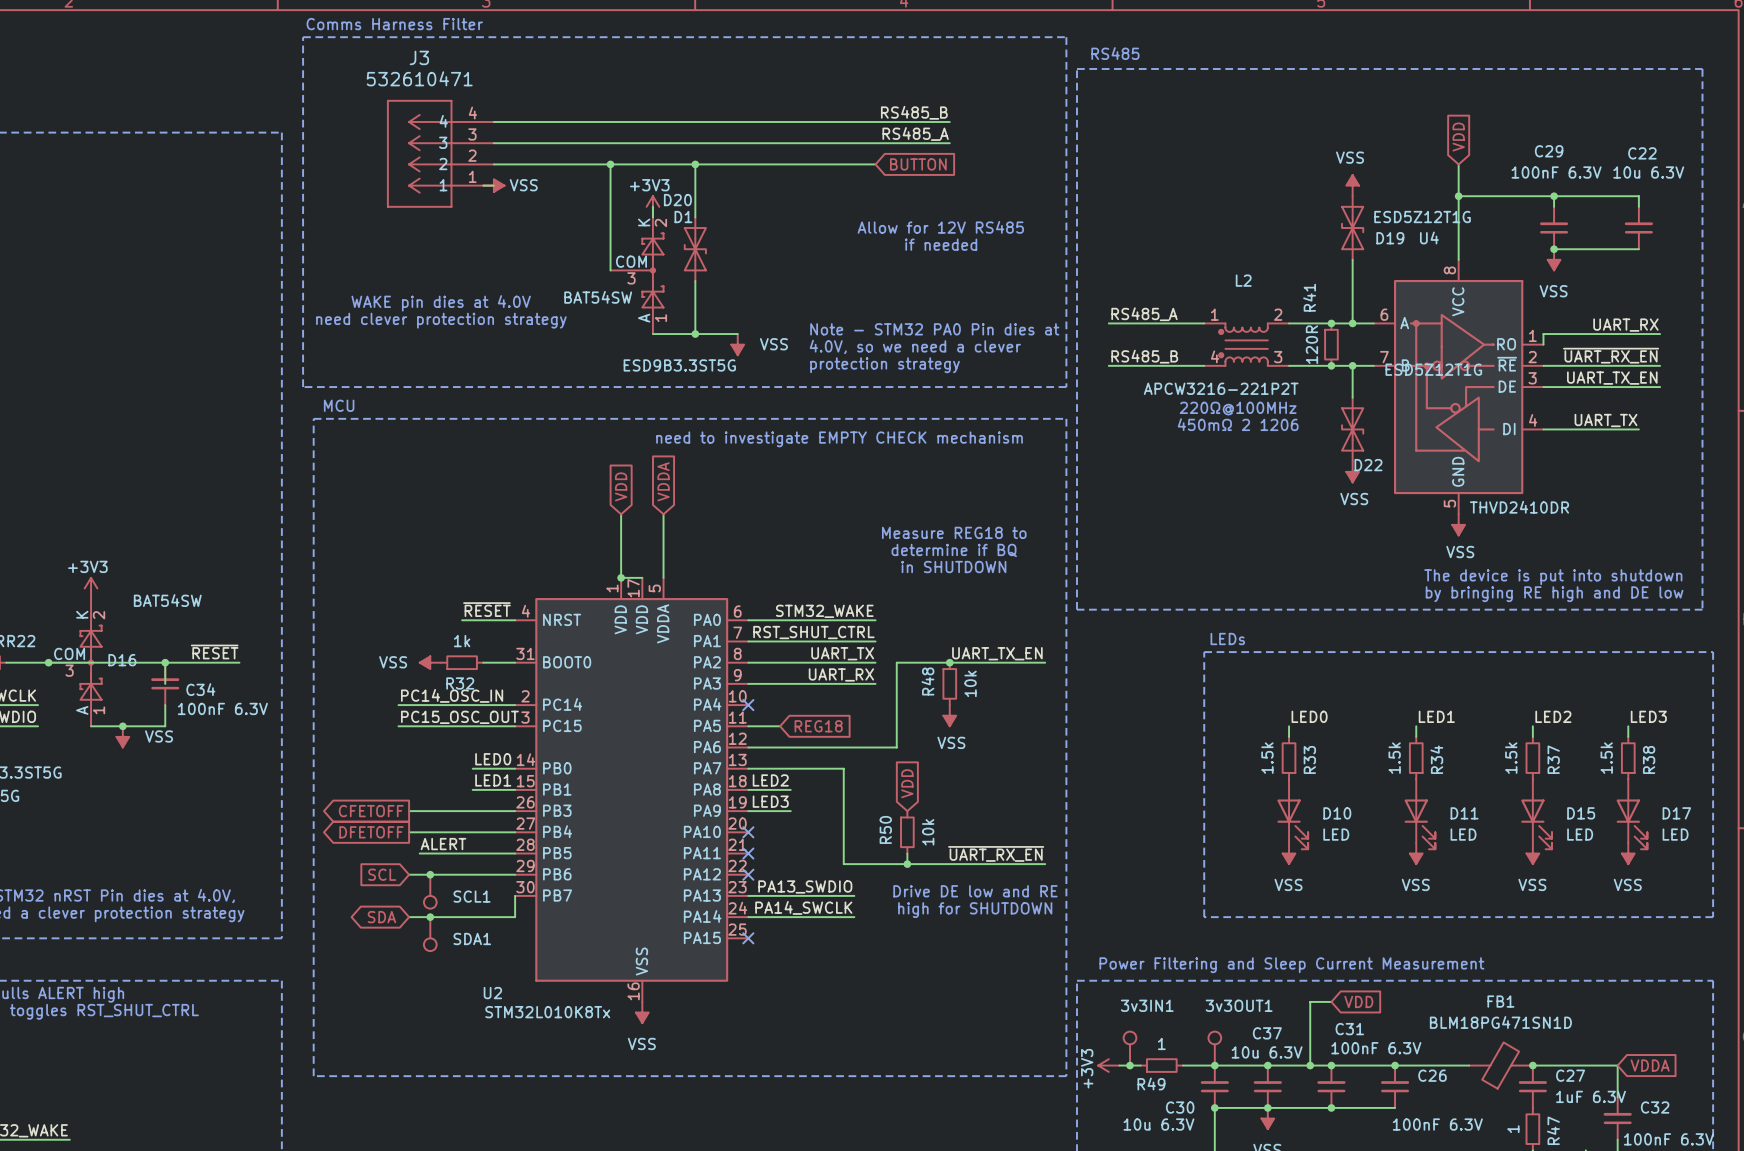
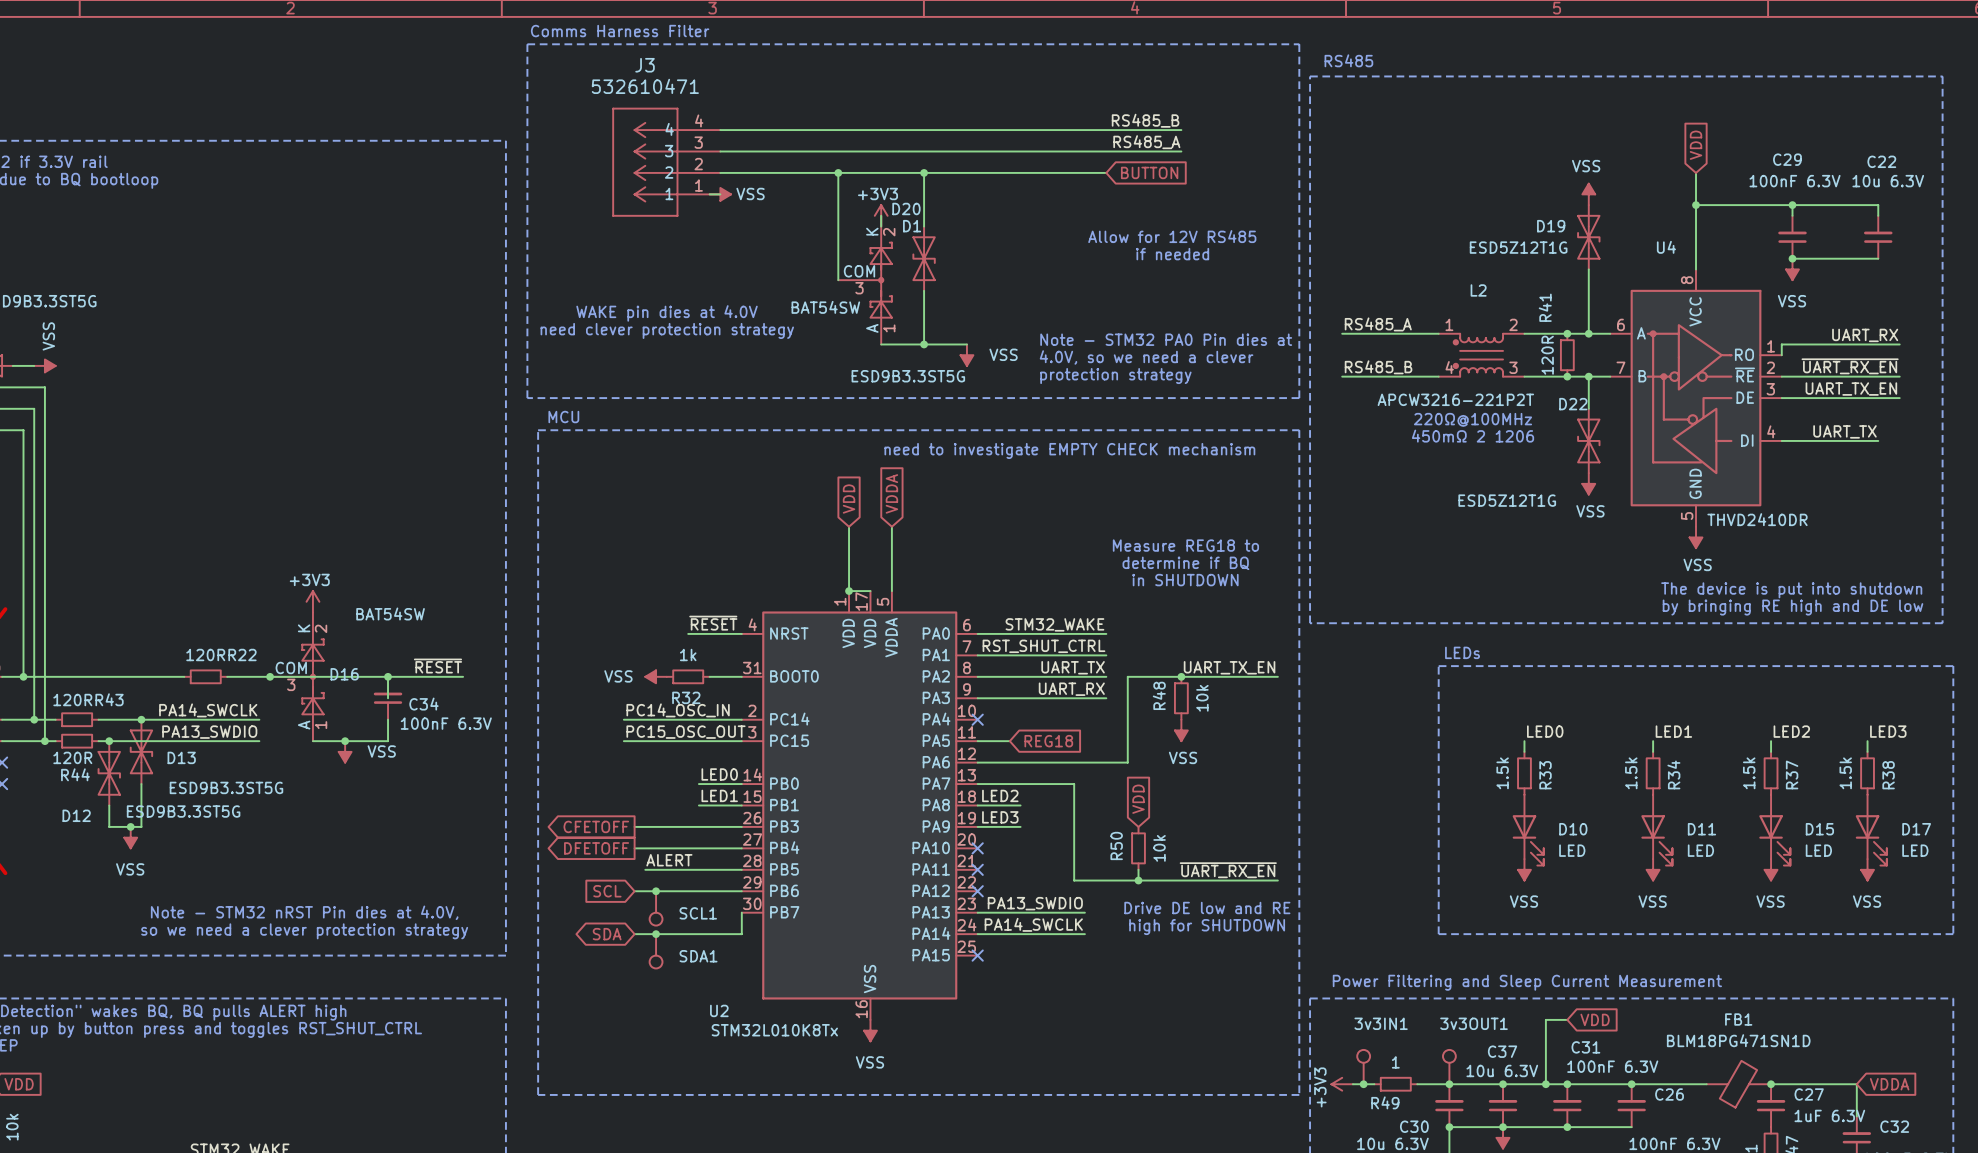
D19 value position: ESD5Z12T1G (1422, 217) -> ESD5Z12T1G (1518, 247)
D19 name position: D19 (1390, 238) -> D19 (1551, 226)
D22 value position: ESD5Z12T1G (1433, 369) -> ESD5Z12T1G (1507, 500)
D22 name position: D22 (1368, 465) -> D22 (1573, 404)

